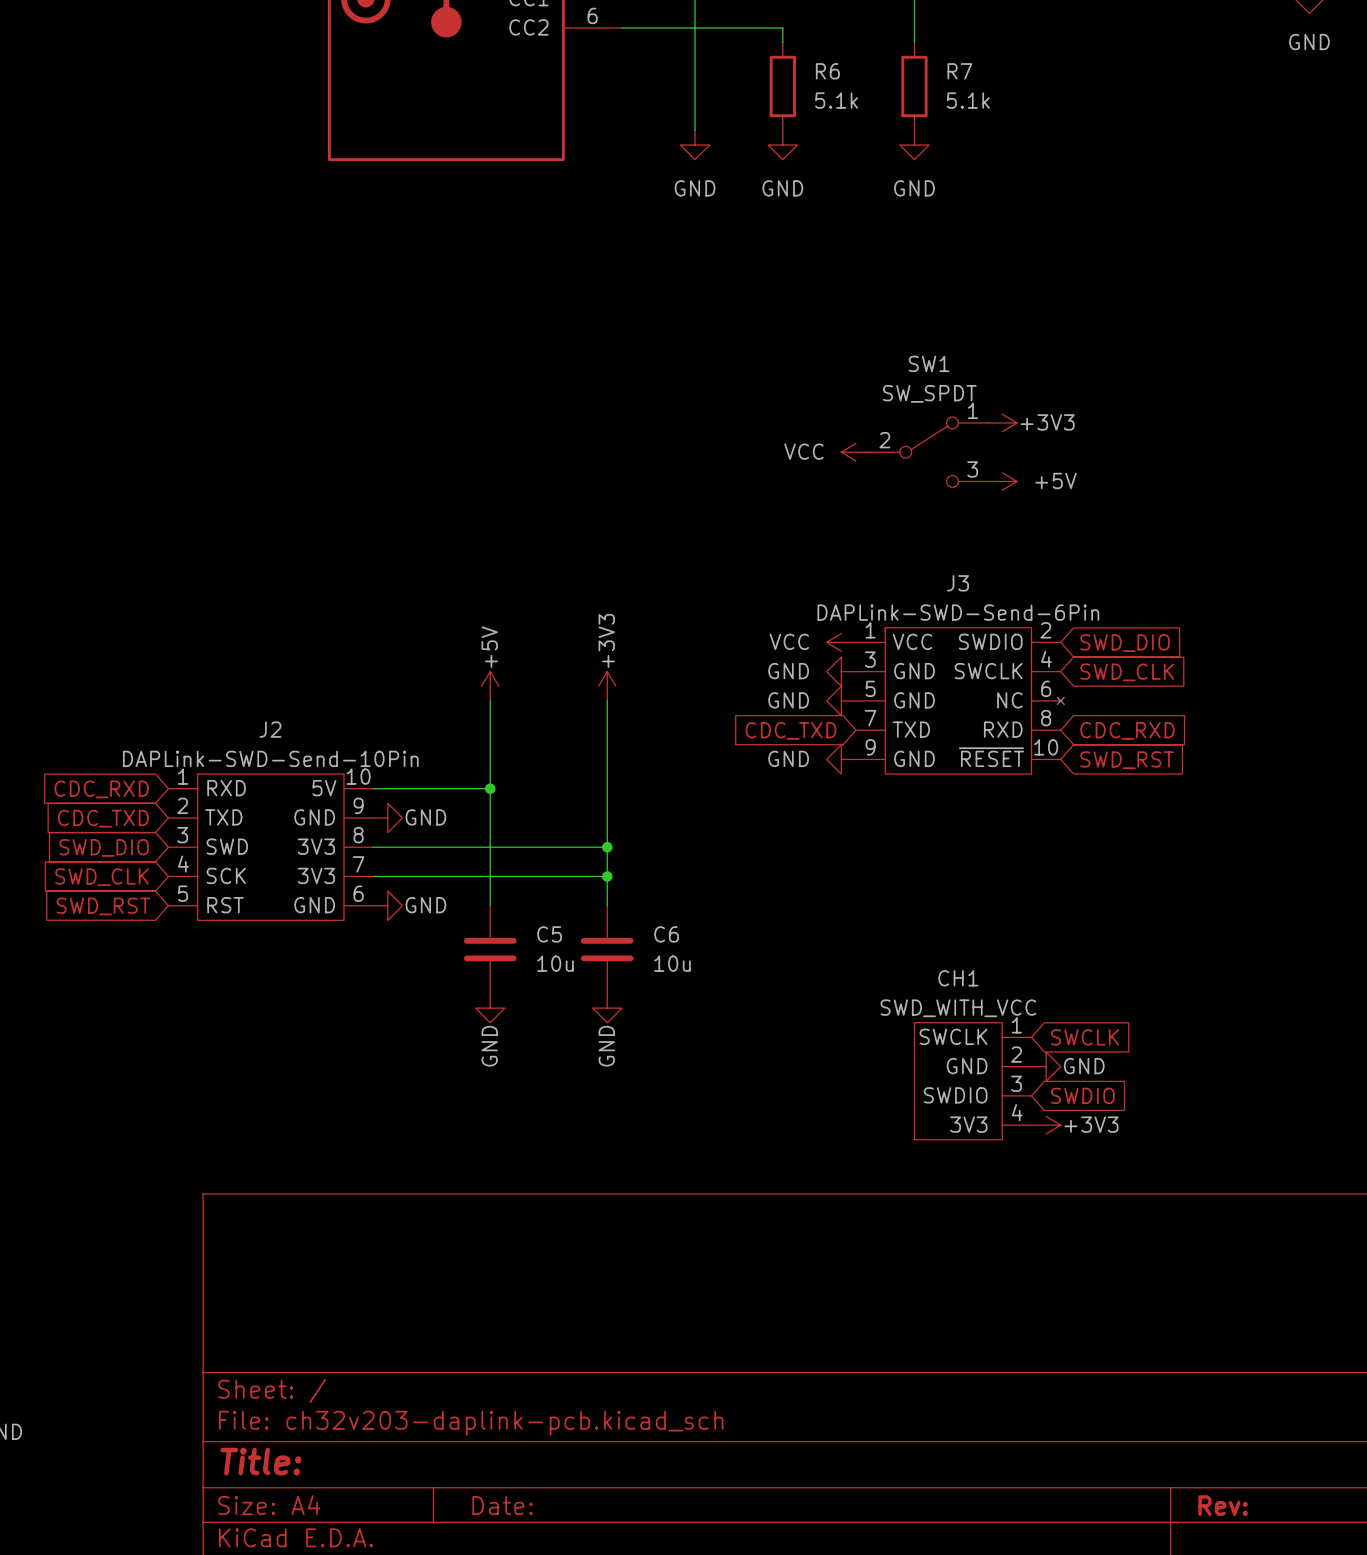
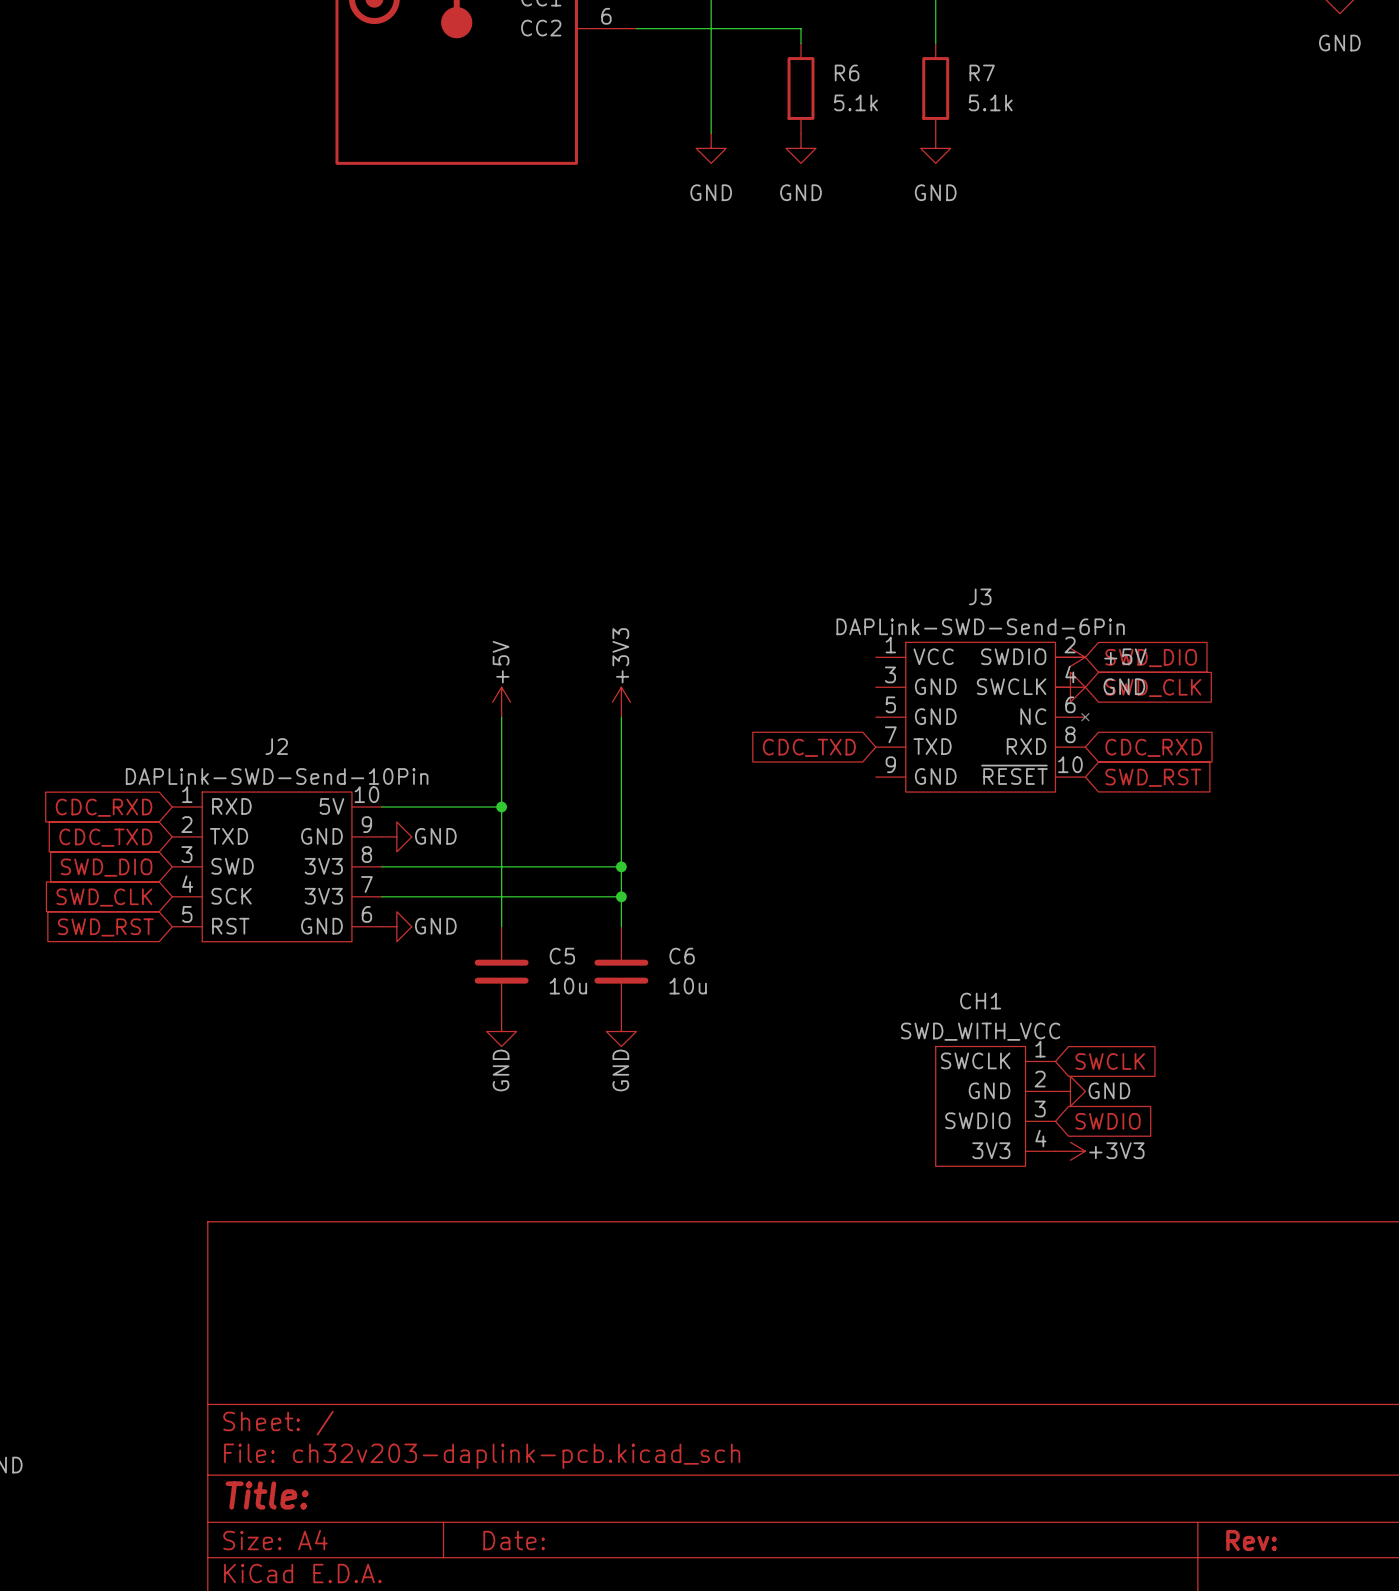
power symbol: +3V3 (1002, 422) -> none
power symbol: VCC (855, 452) -> none
SW1: SW_SPDT (929, 452) -> none
power symbol position: +5V (1002, 481) -> +5V (1070, 657)
power symbol: VCC (841, 642) -> none
power symbol: GND (841, 671) -> none
power symbol: none -> GND (1070, 687)
power symbol: GND (841, 700) -> none
power symbol: GND (841, 759) -> none

